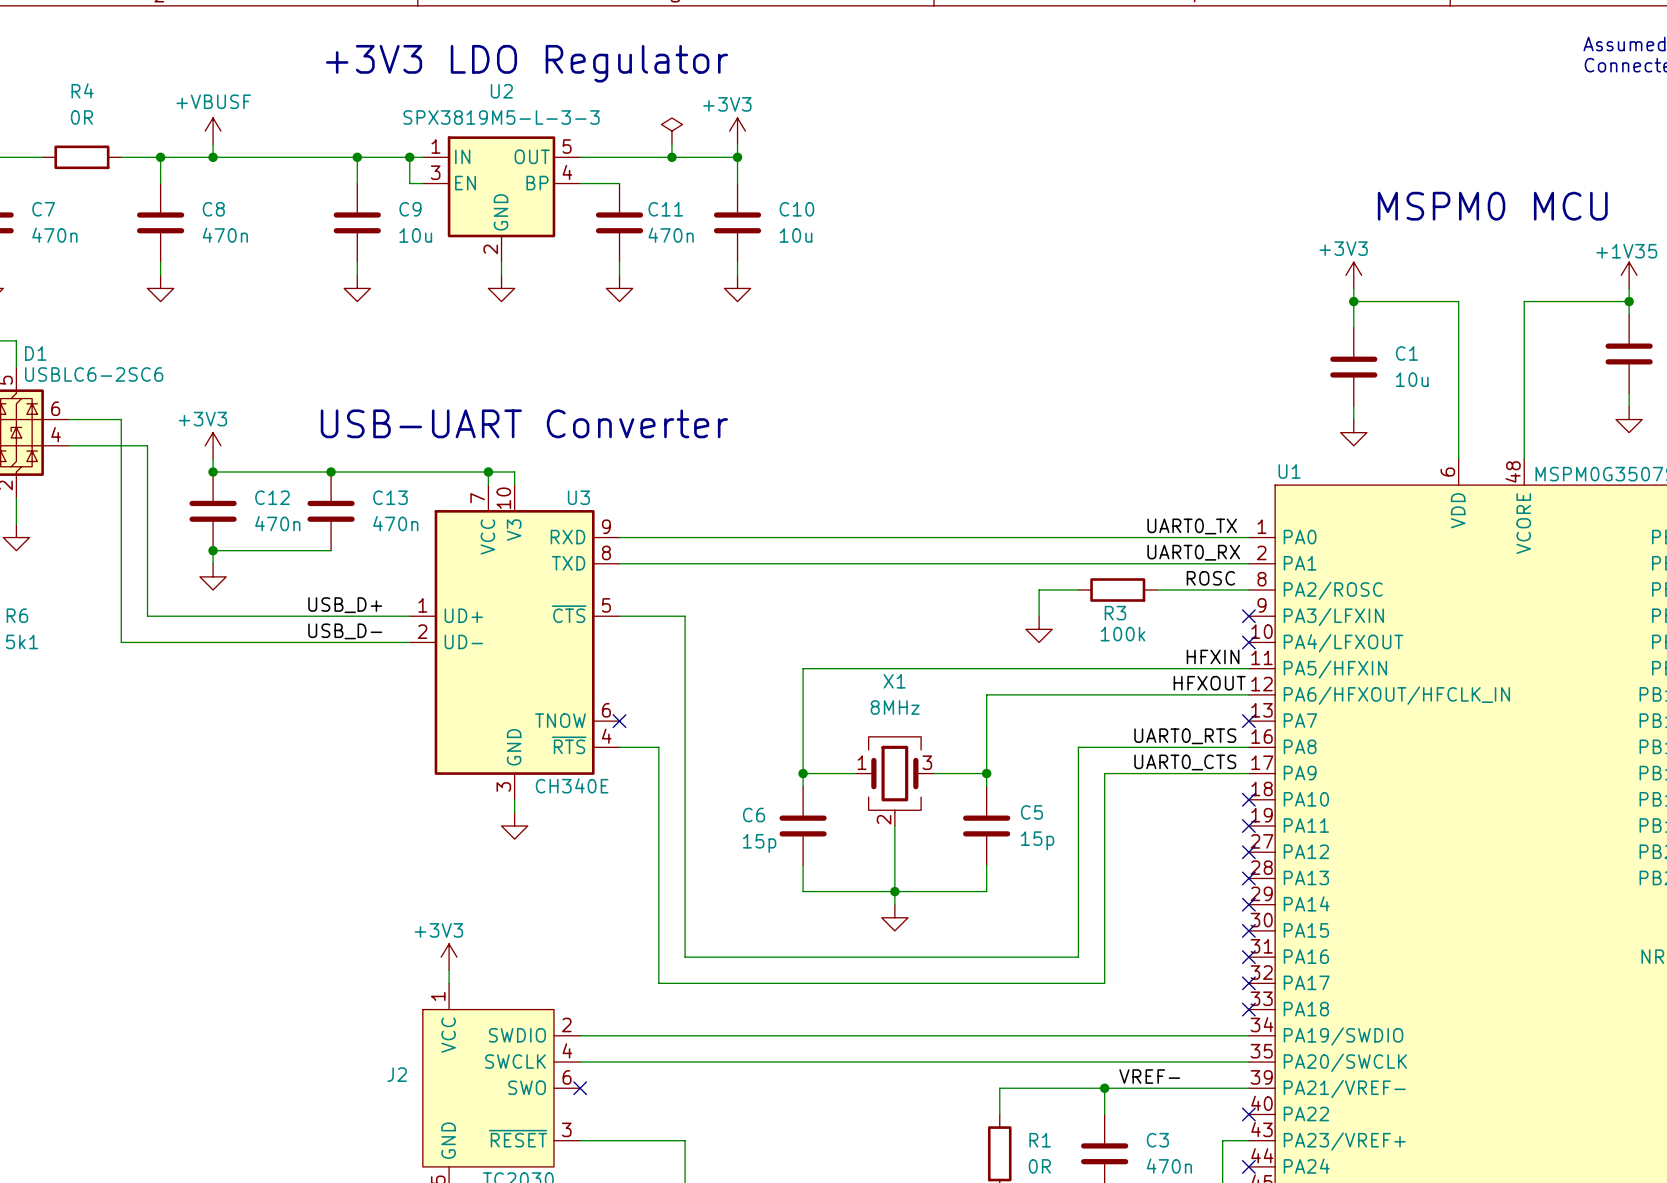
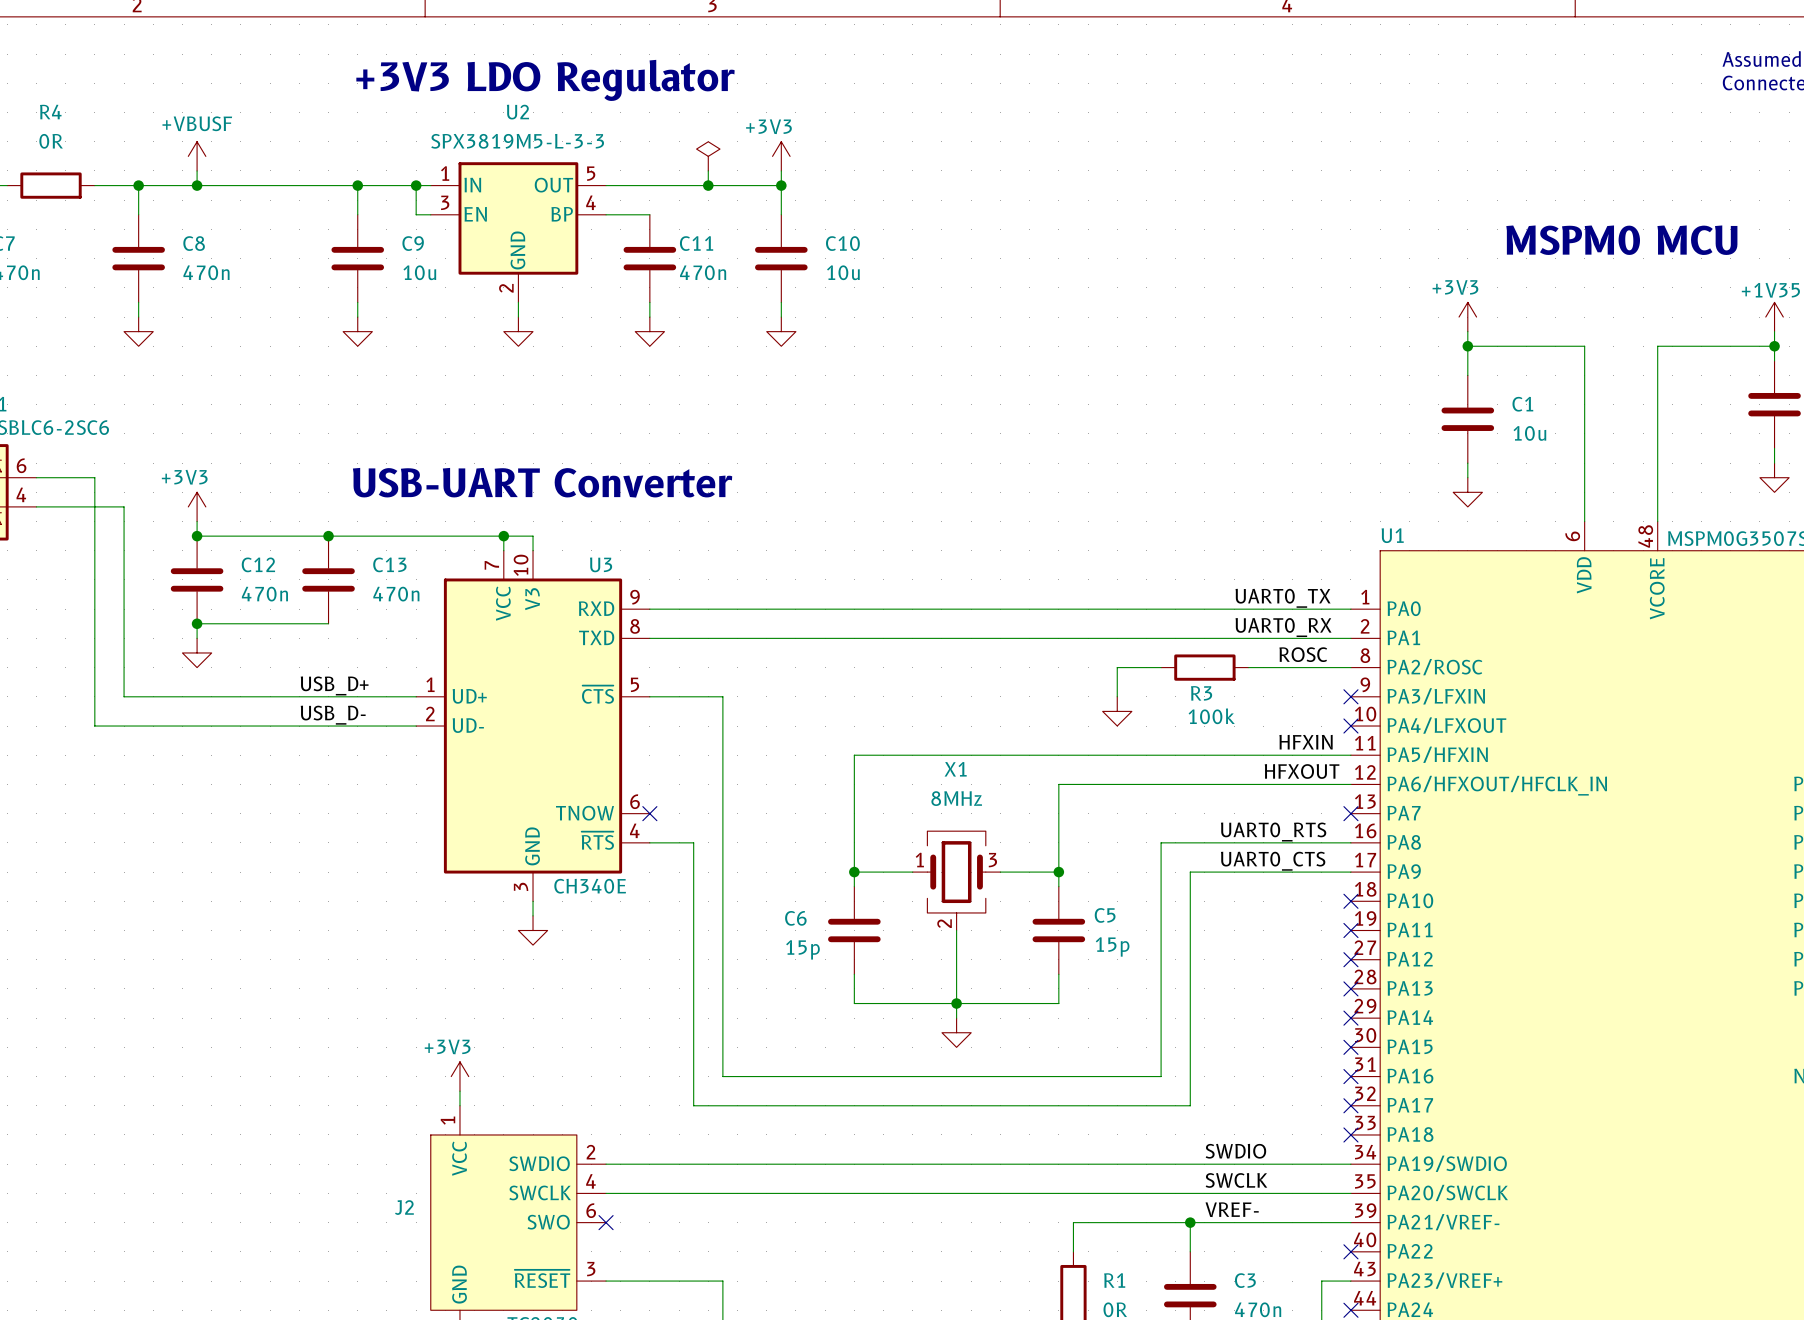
label: none -> SWDIO (1235, 1151)
label: none -> SWCLK (1236, 1180)

